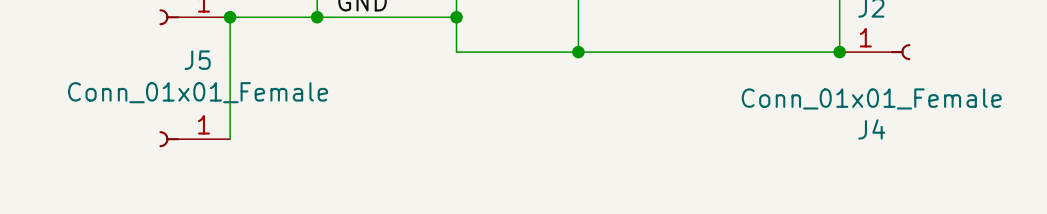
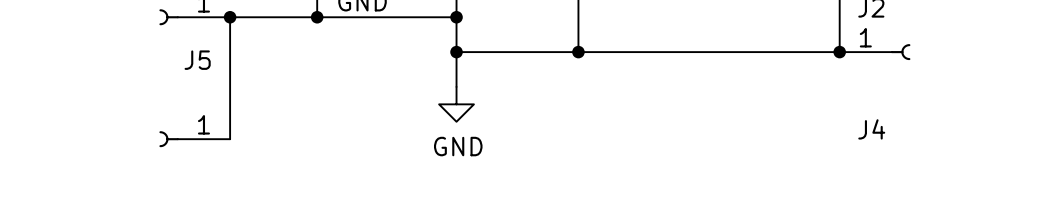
wire: none -> (456, 52) (456, 86)
junction: none -> (456, 52)
J5 value: Conn_01x01_Female (198, 92) -> none
J4 value: Conn_01x01_Female (871, 98) -> none
power symbol: none -> GND (456, 104)

